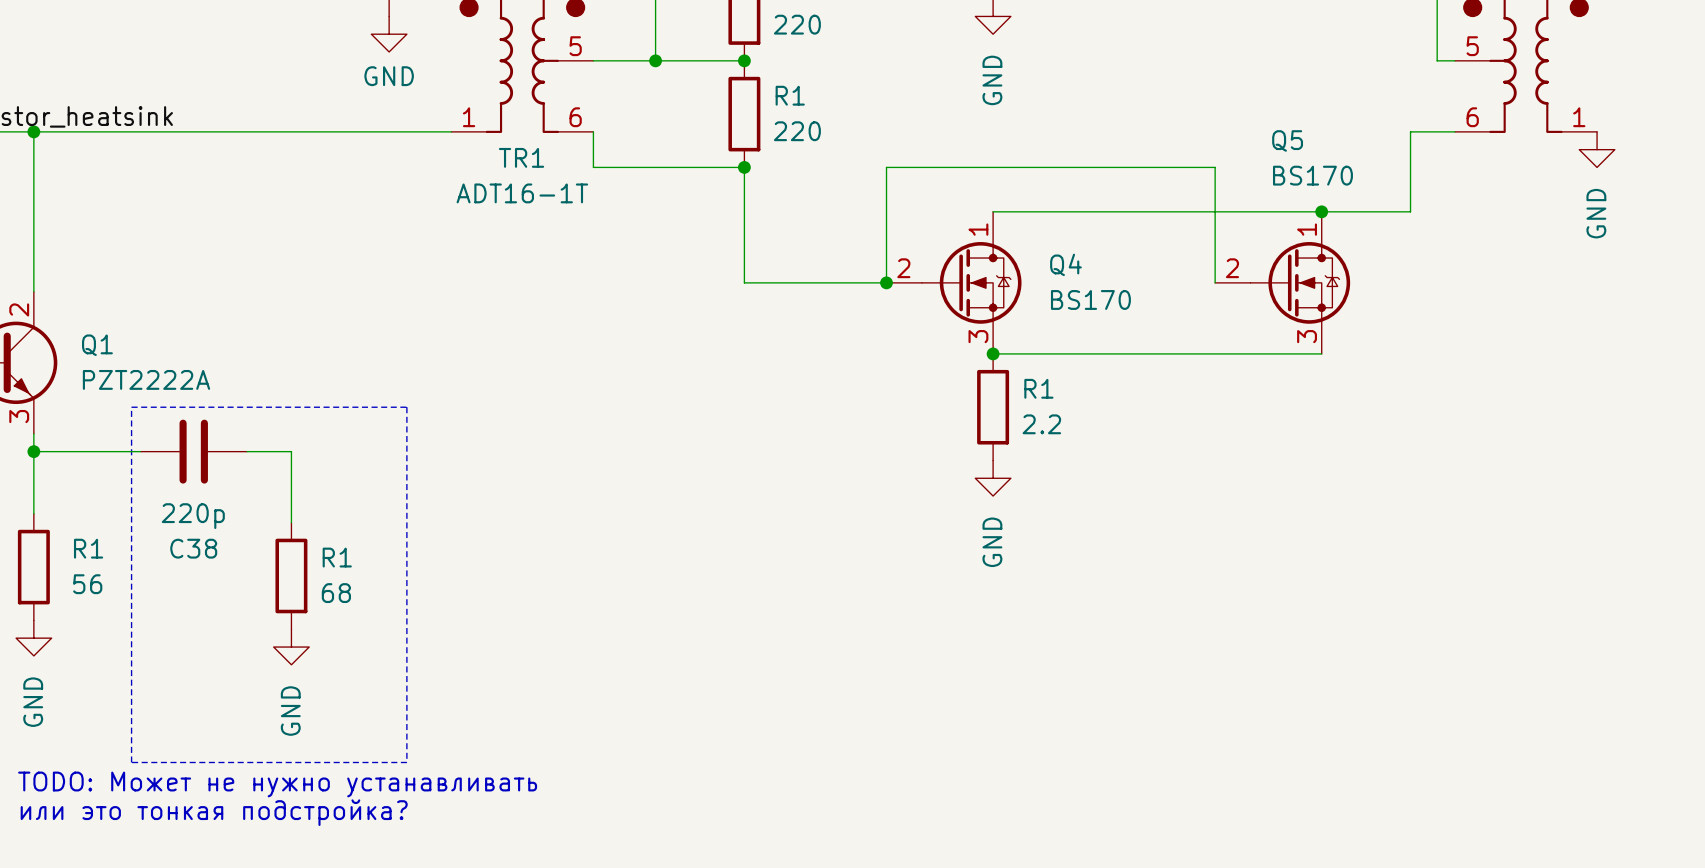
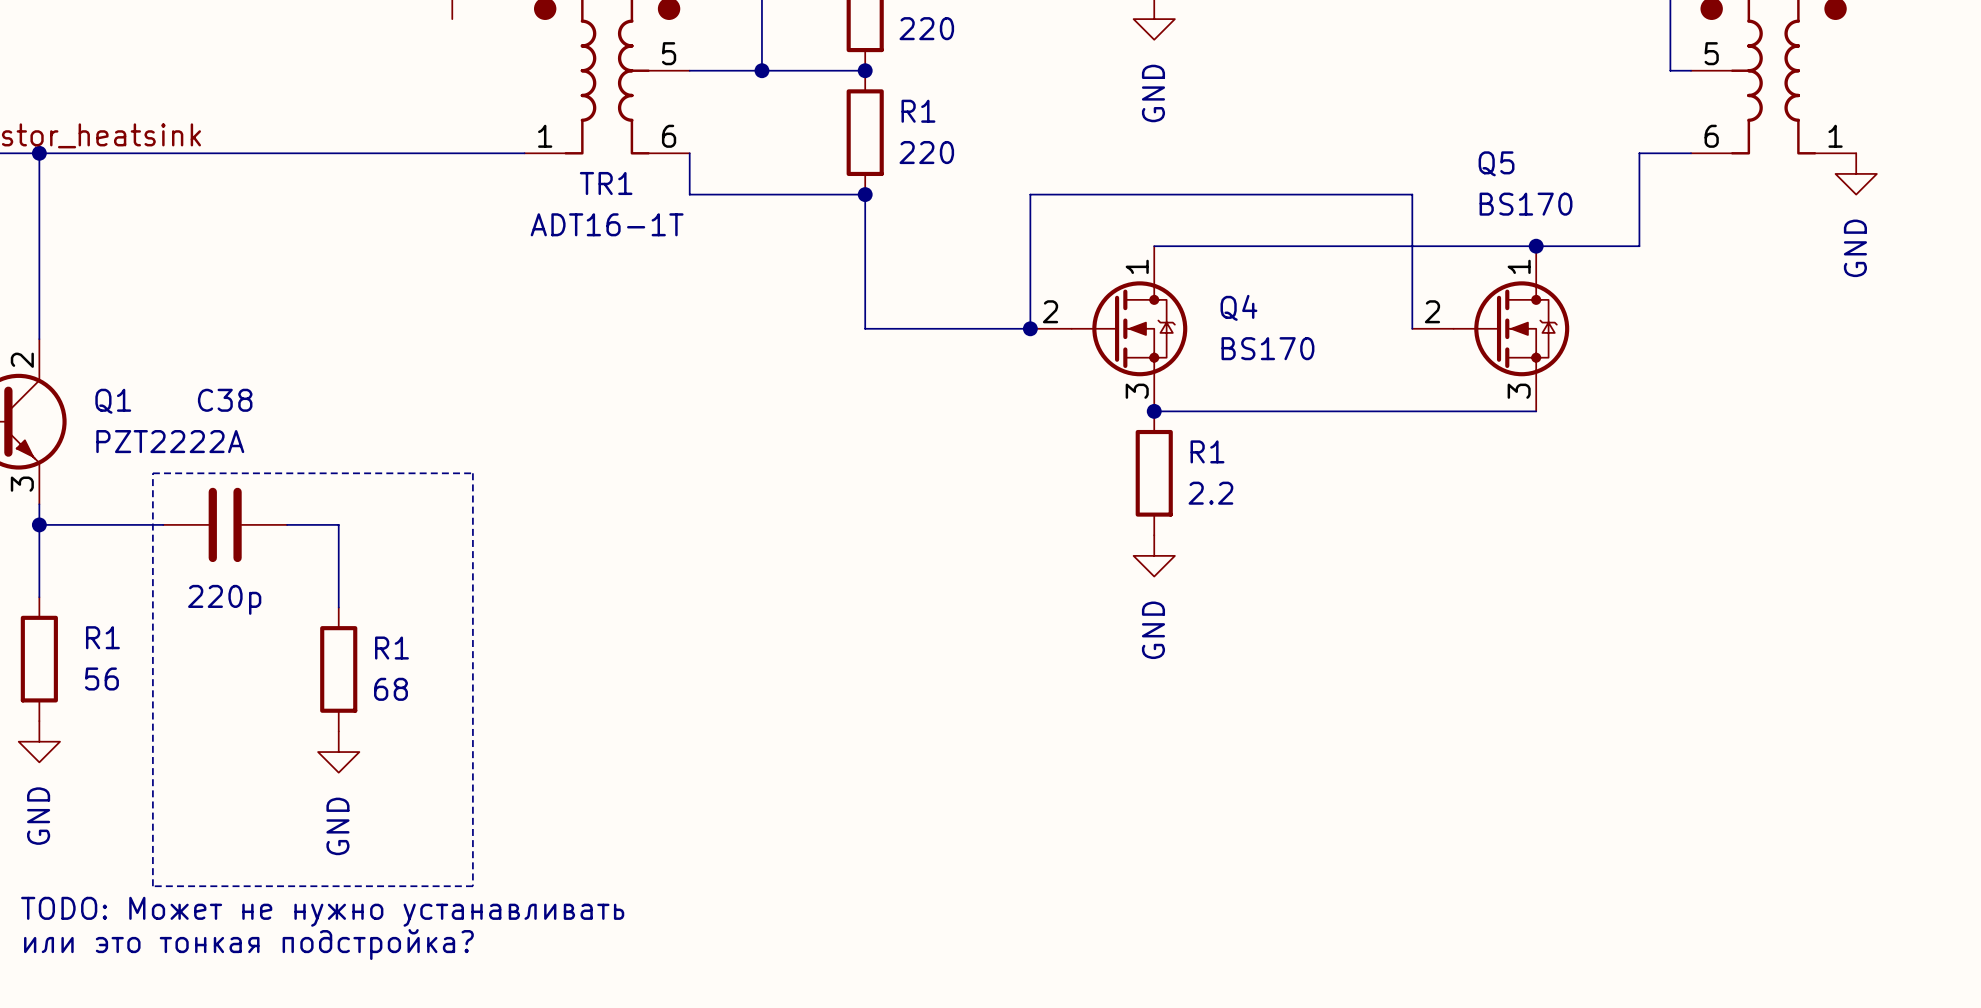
power symbol: GND (389, 34) -> none
C38 name position: C38 (193, 548) -> C38 (225, 400)

